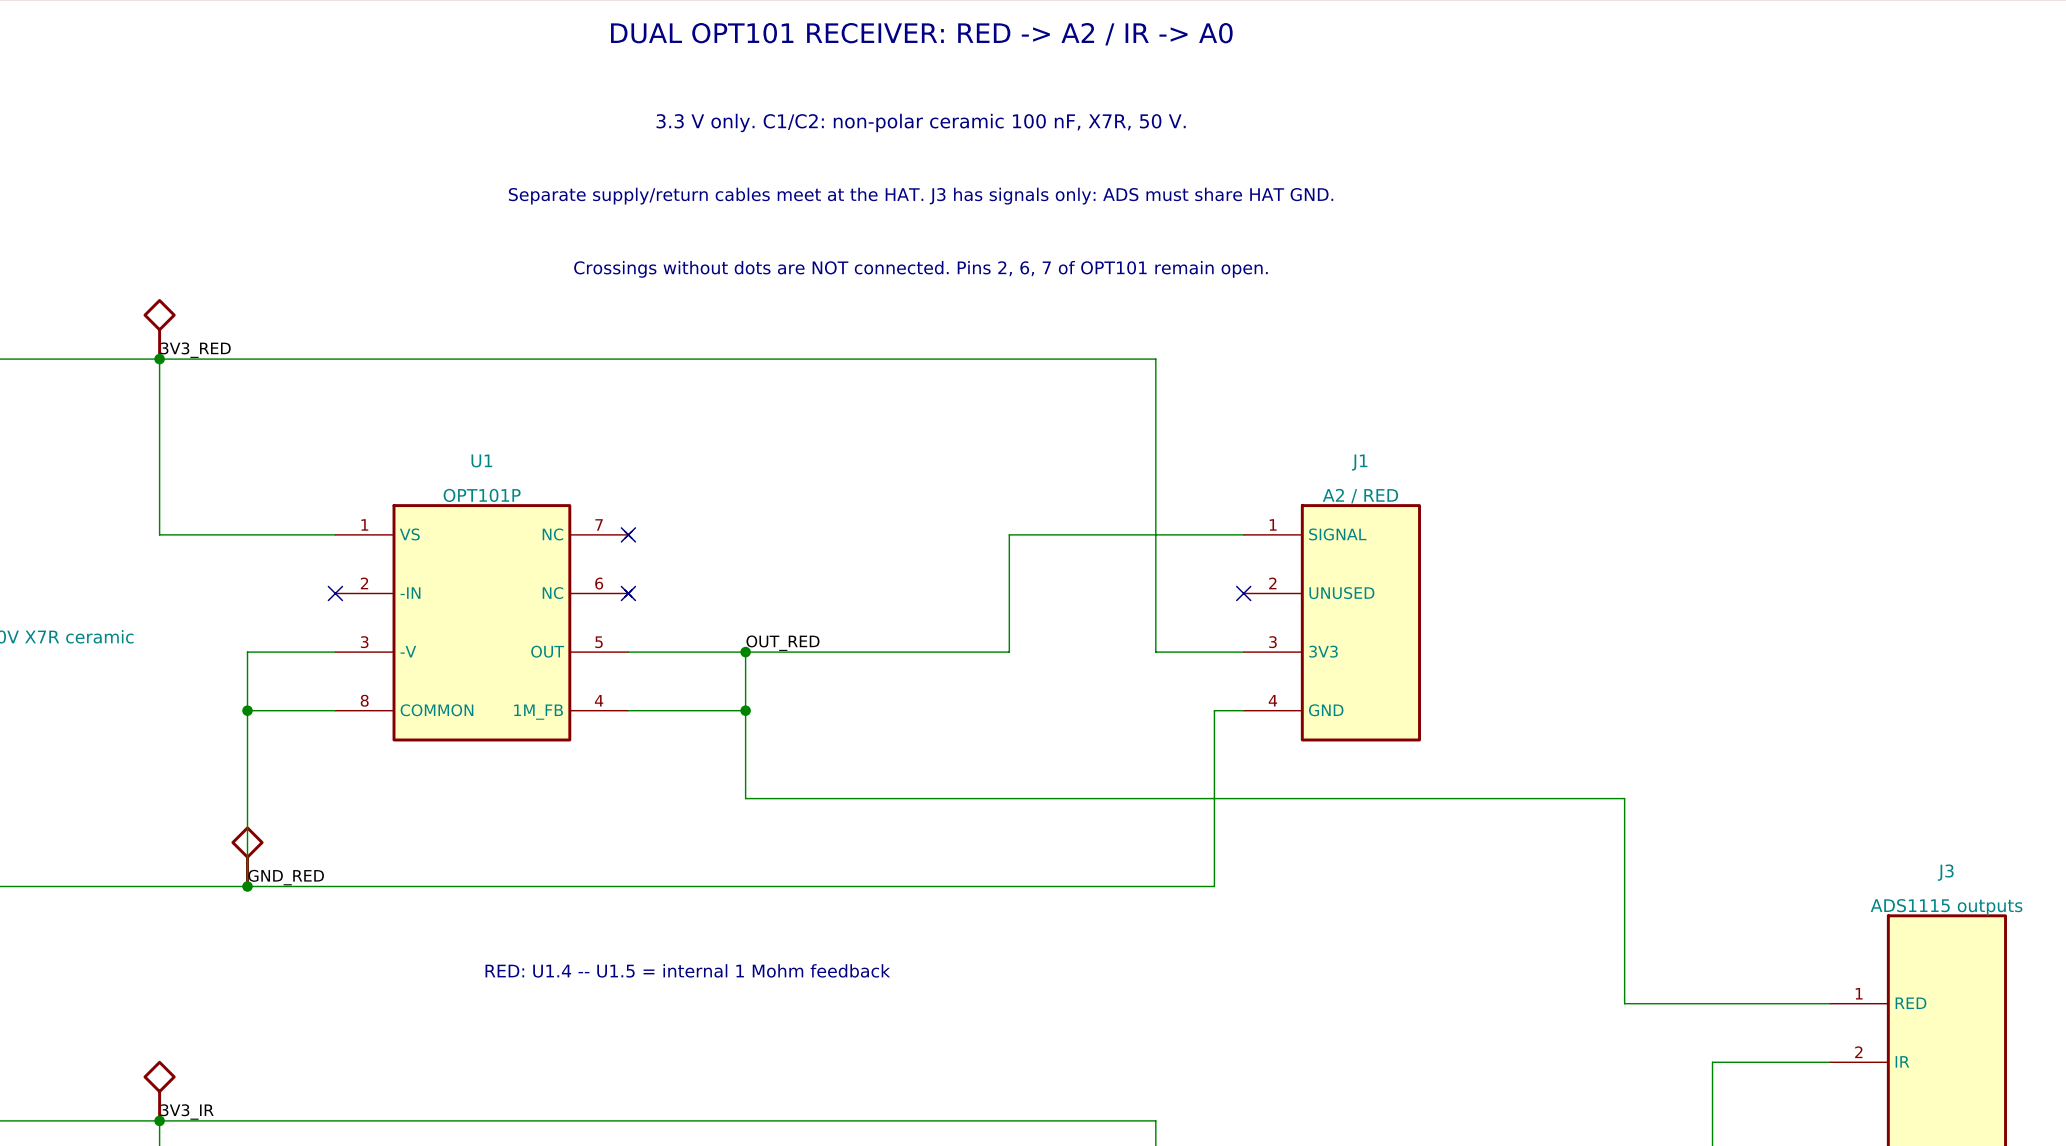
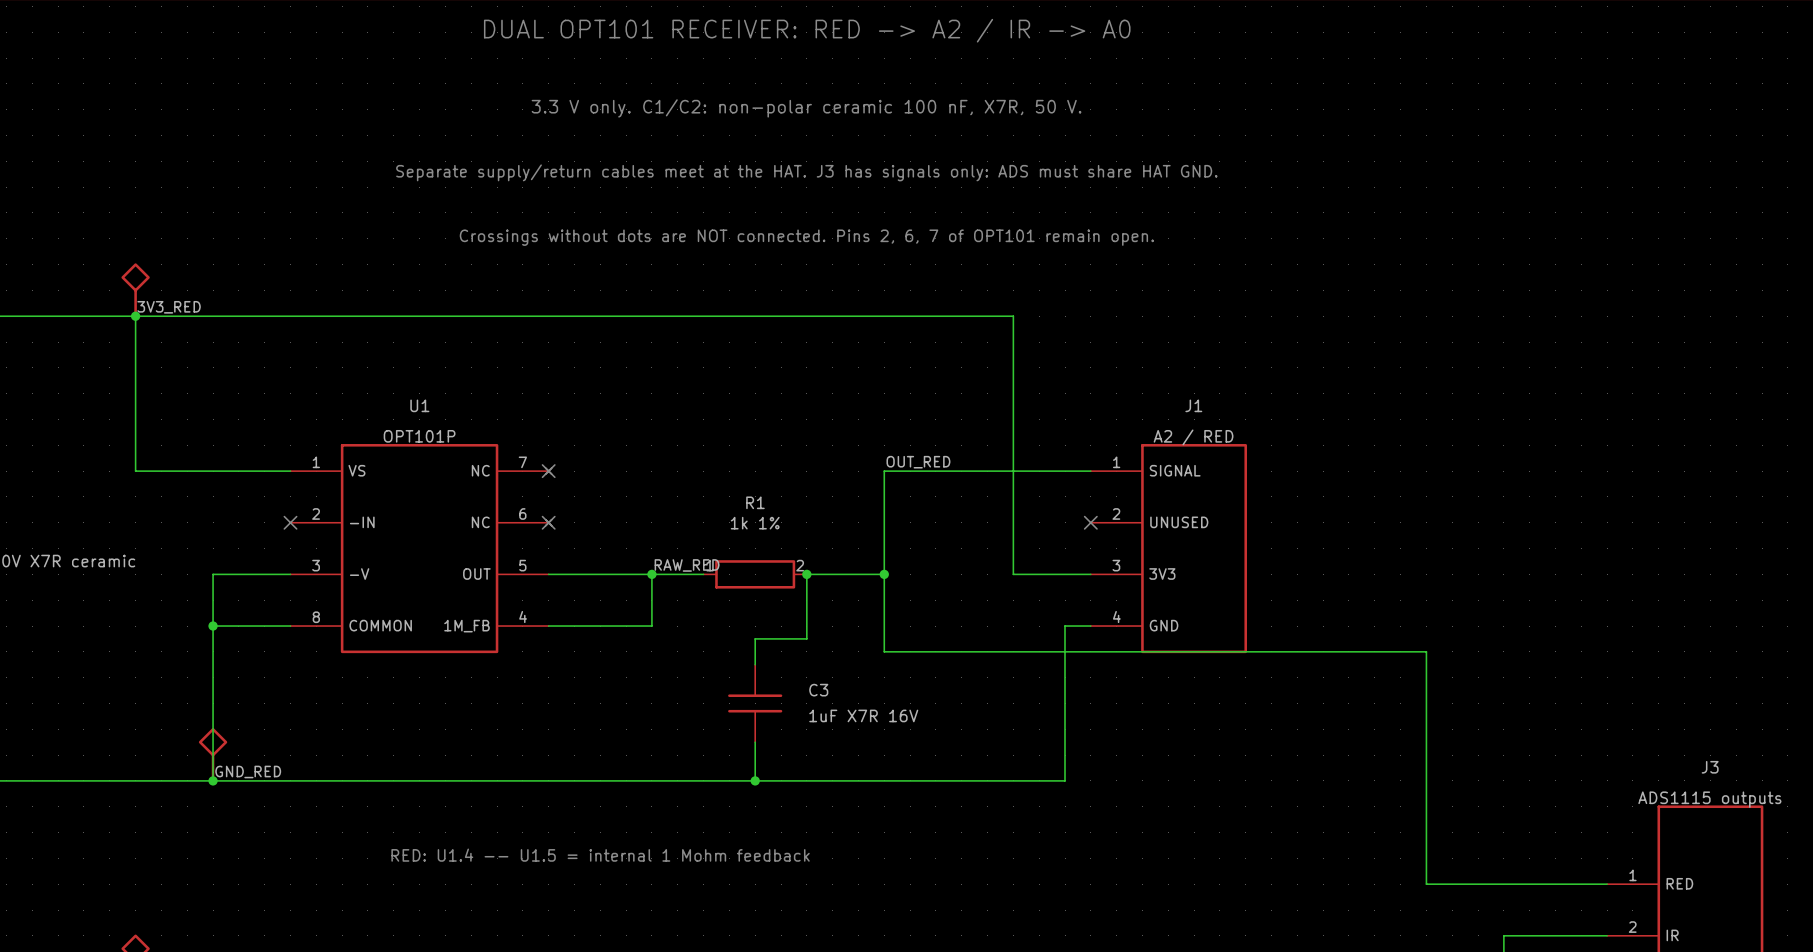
label: none -> OUT_RED (918, 462)
label: OUT_RED (782, 643) -> RAW_RED (687, 565)
wire: (804, 652) (921, 652) -> (755, 664) (755, 638) (806, 638) (806, 574)
R1: none -> 1k 1% (755, 574)
junction: none -> (806, 574)
junction: none -> (884, 574)
wire: (745, 710) (745, 798) (1624, 798) -> (884, 574) (884, 651) (1426, 651) (1426, 703)
junction: (745, 710) -> none
C3: none -> 1uF X7R 16V (755, 703)
wire: none -> (755, 742) (755, 780)
junction: none -> (755, 780)

